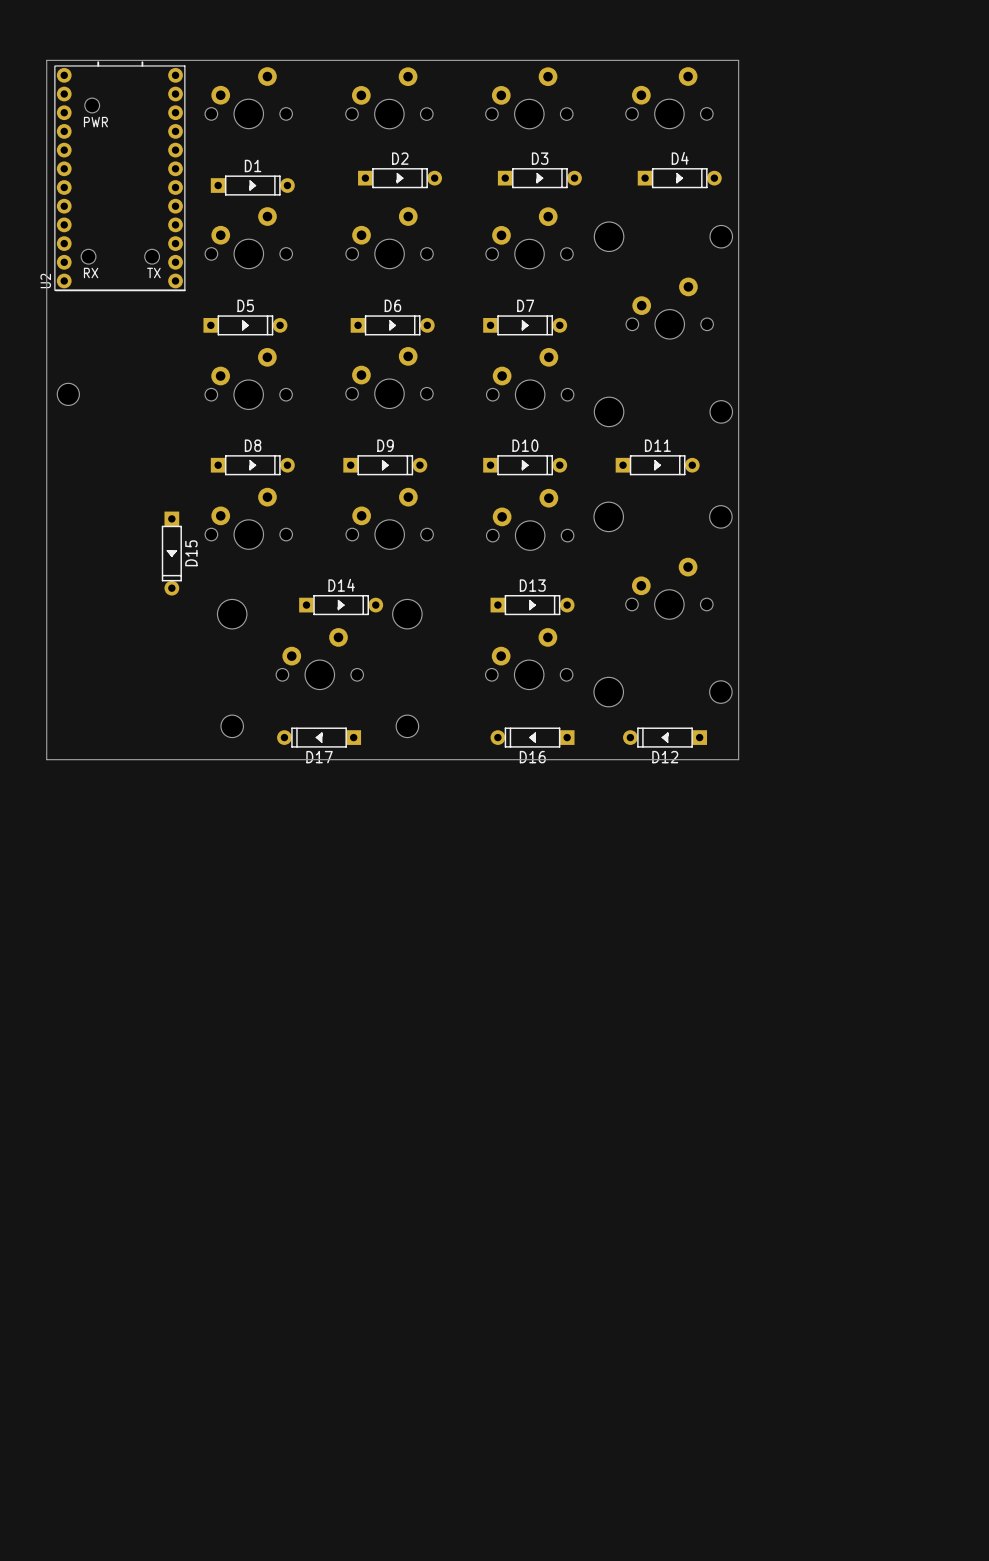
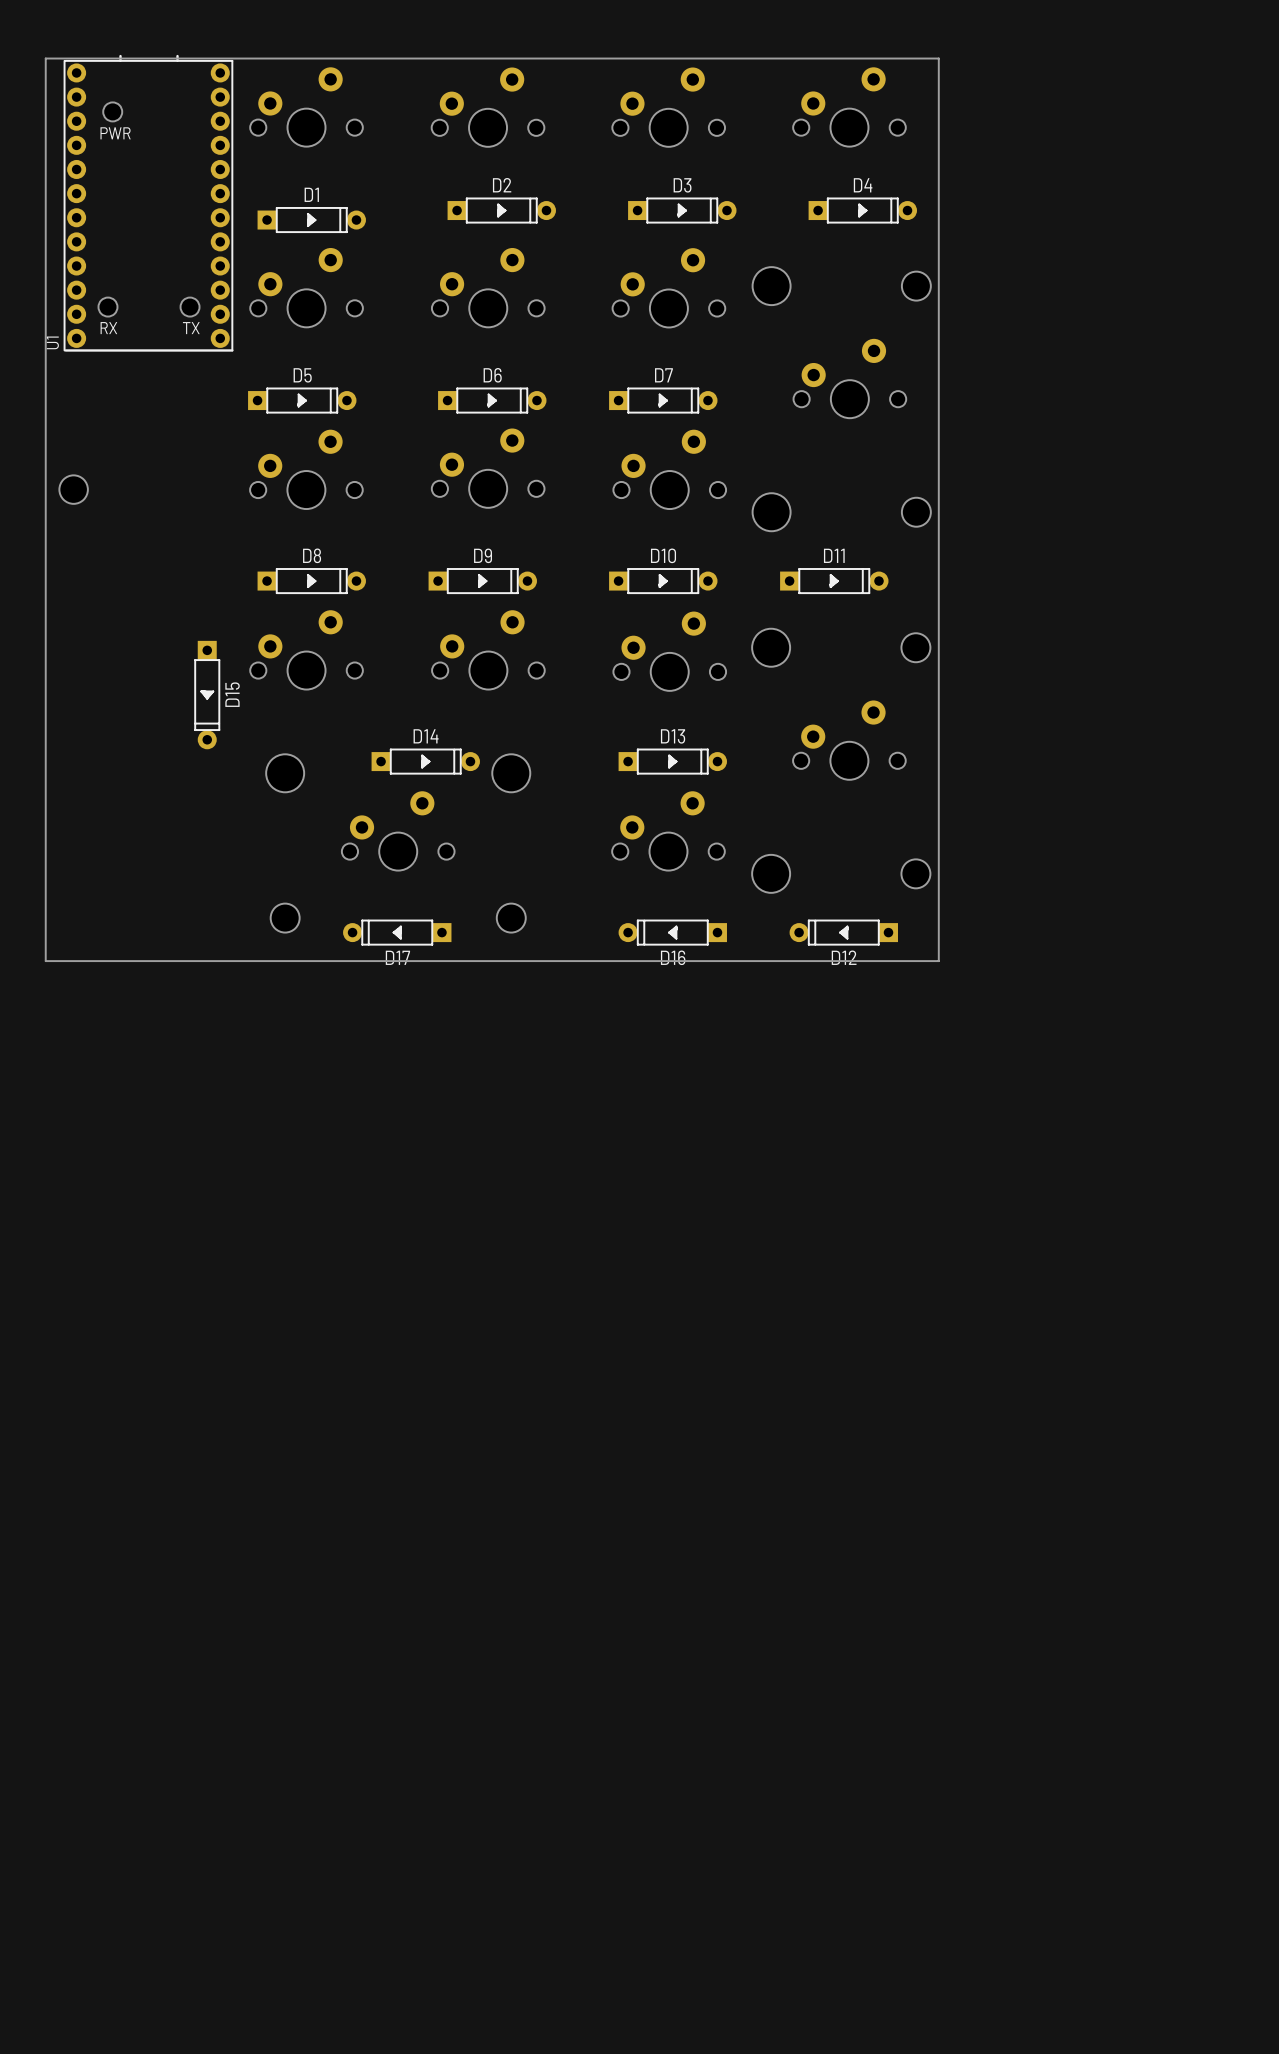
U1: none -> (148, 203)
U2: (120, 176) -> none

